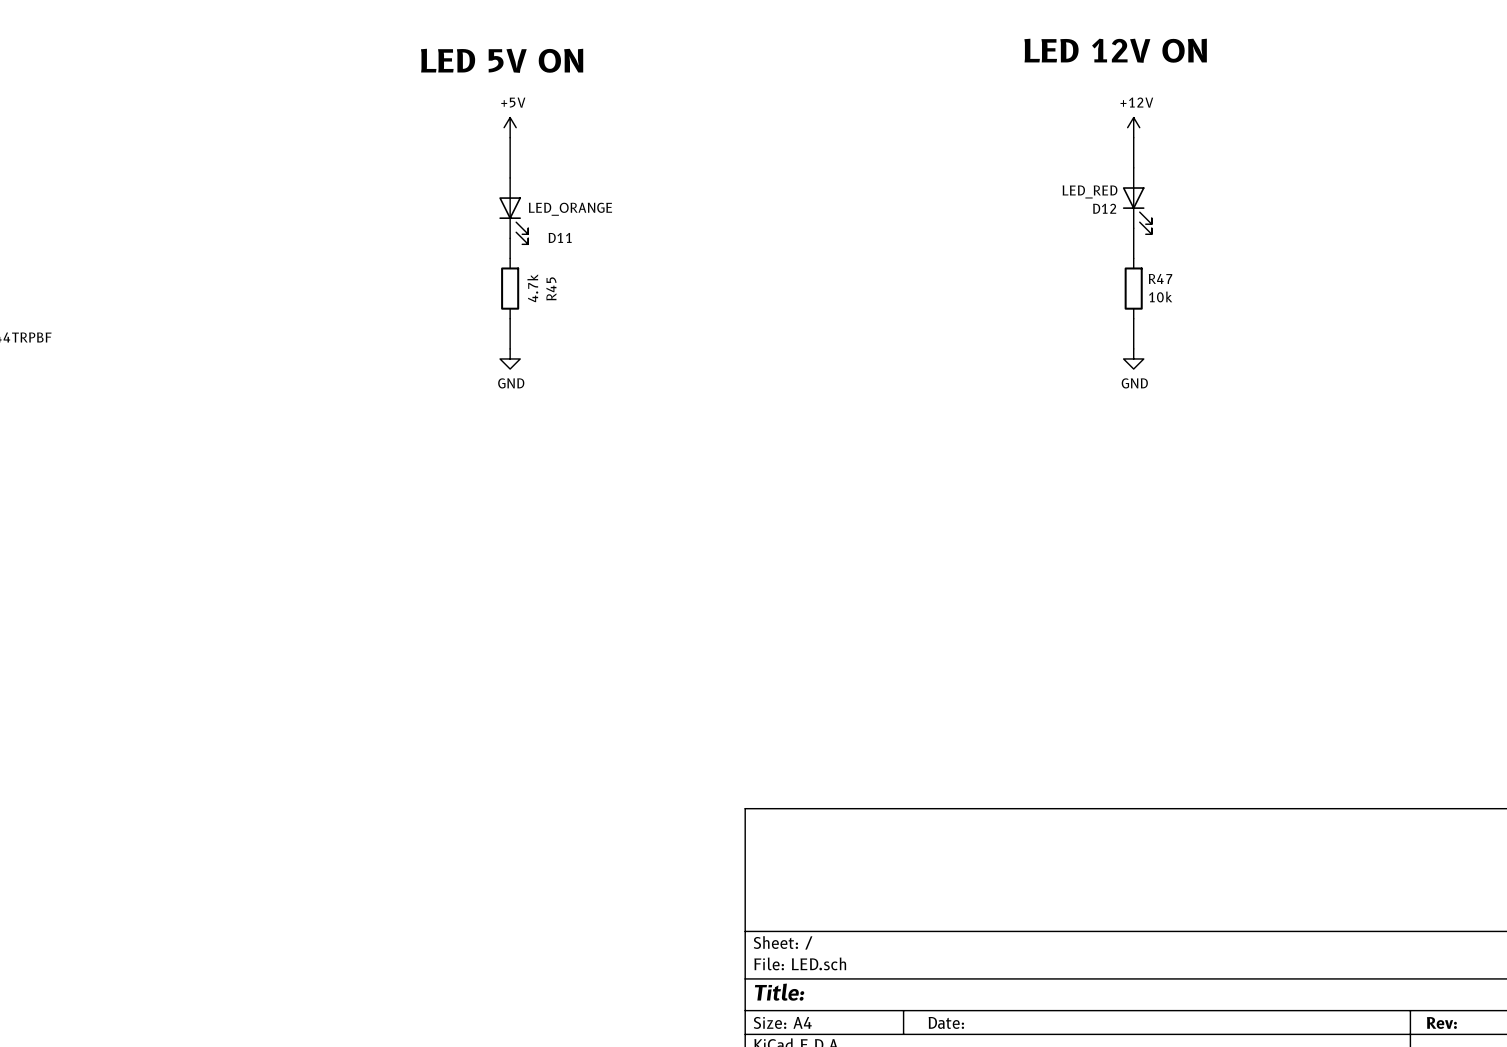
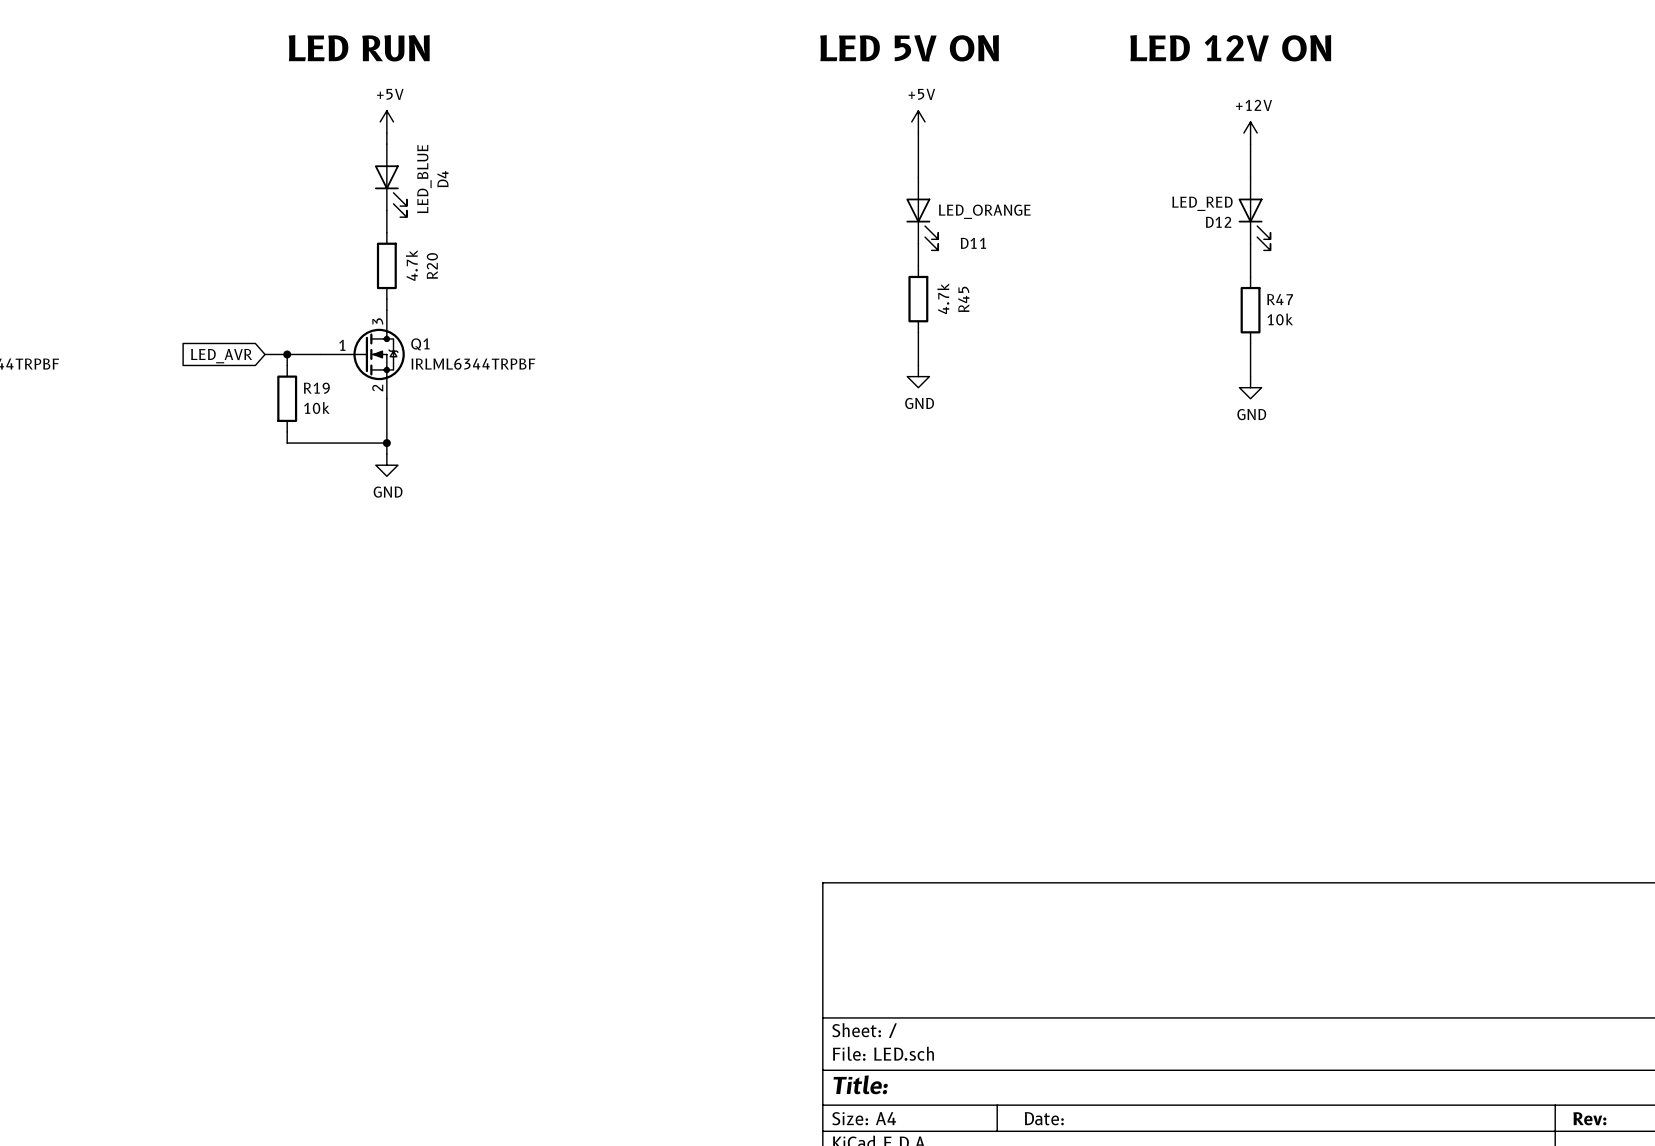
text: none -> LED 5V ON (909, 48)
text: LED 5V ON (502, 60) -> LED RUN (359, 48)
power symbol: none -> +5V (386, 121)
power symbol: none -> +5V (918, 121)
wire: none -> (386, 133) (386, 144)
power symbol: +5V (510, 127) -> none
wire: none -> (918, 133) (918, 177)
wire: (510, 137) (510, 177) -> none
D4: none -> LED_BLUE (390, 180)
D11 position: (513, 211) -> (922, 213)
wire: none -> (918, 243) (918, 265)
wire: (510, 238) (510, 258) -> (386, 210) (386, 232)
R20: none -> 4.7k (386, 265)
wire: none -> (386, 299) (386, 310)
R45 position: (510, 288) -> (918, 299)
wire: none -> (918, 332) (918, 365)
wire: (510, 318) (510, 348) -> none
wire: none -> (265, 354) (320, 354)
wire: none -> (287, 354) (287, 365)
junction: none -> (287, 354)
Q1: none -> IRLML6344TRPBF (362, 354)
global label: none -> LED_AVR (221, 356)
power symbol: none -> GND (918, 376)
power symbol: GND (510, 358) -> none
R19: none -> 10k (287, 398)
wire: none -> (386, 398) (386, 454)
wire: none -> (287, 431) (287, 443) (386, 443)
junction: none -> (386, 443)
power symbol: none -> GND (386, 465)

